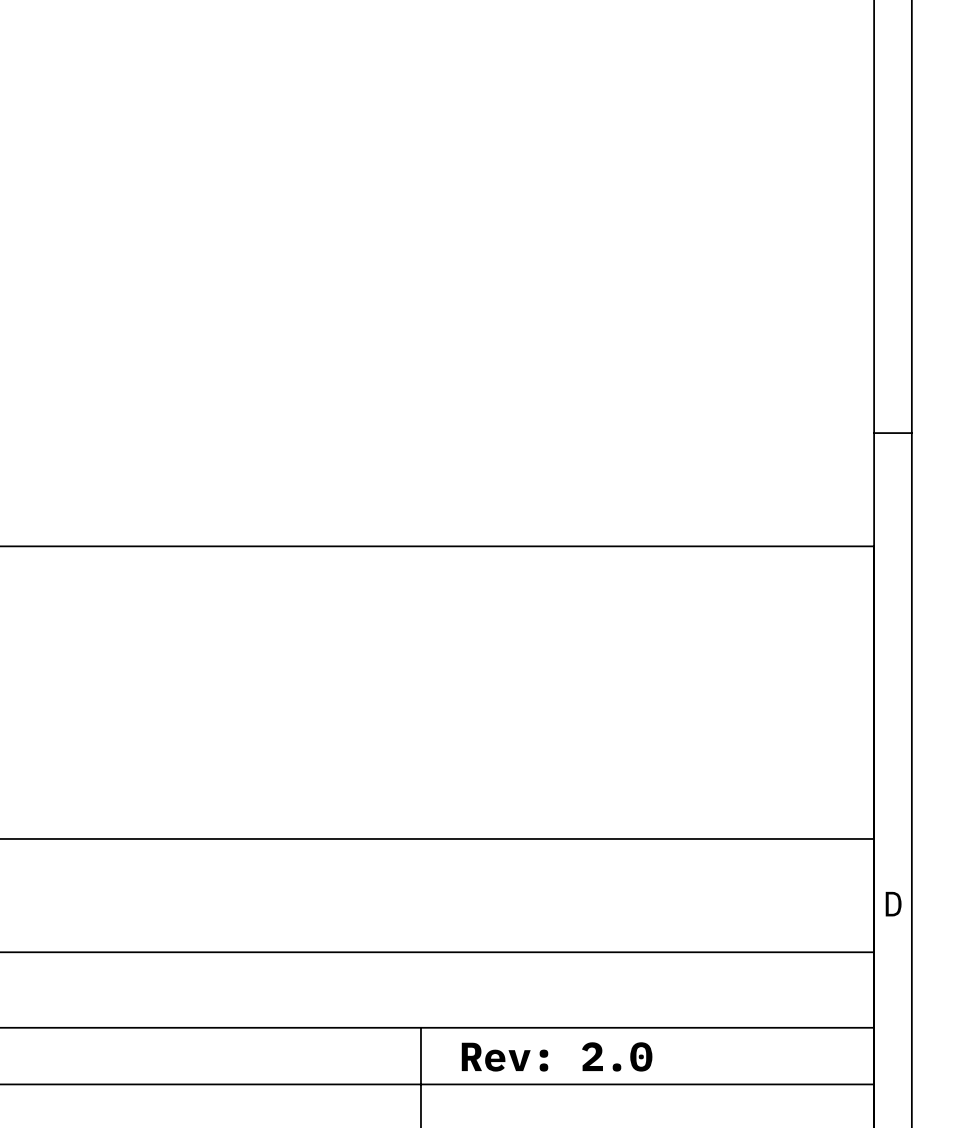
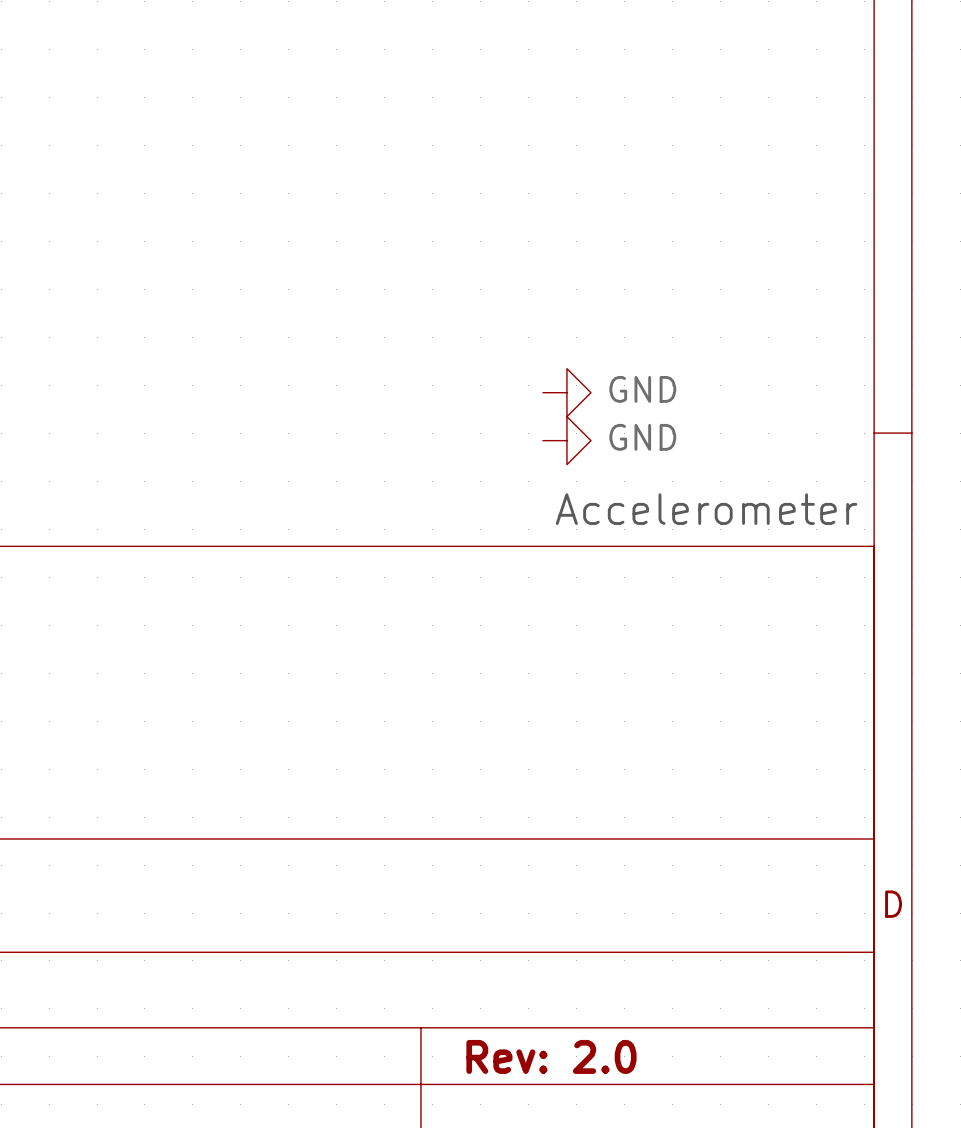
power symbol: none -> GND (566, 392)
power symbol: none -> GND (566, 440)
text: none -> Accelerometer (706, 509)

